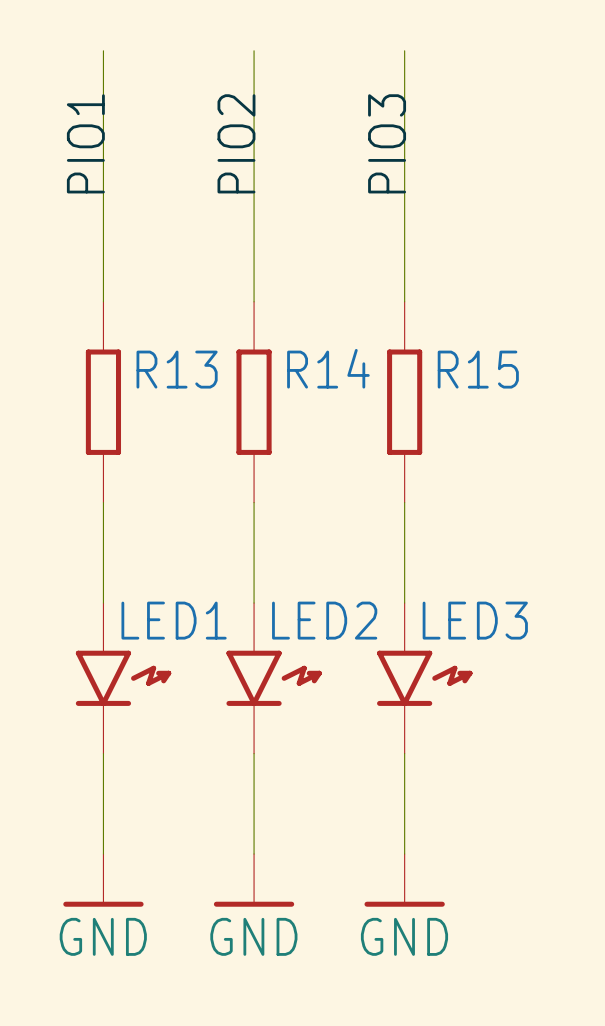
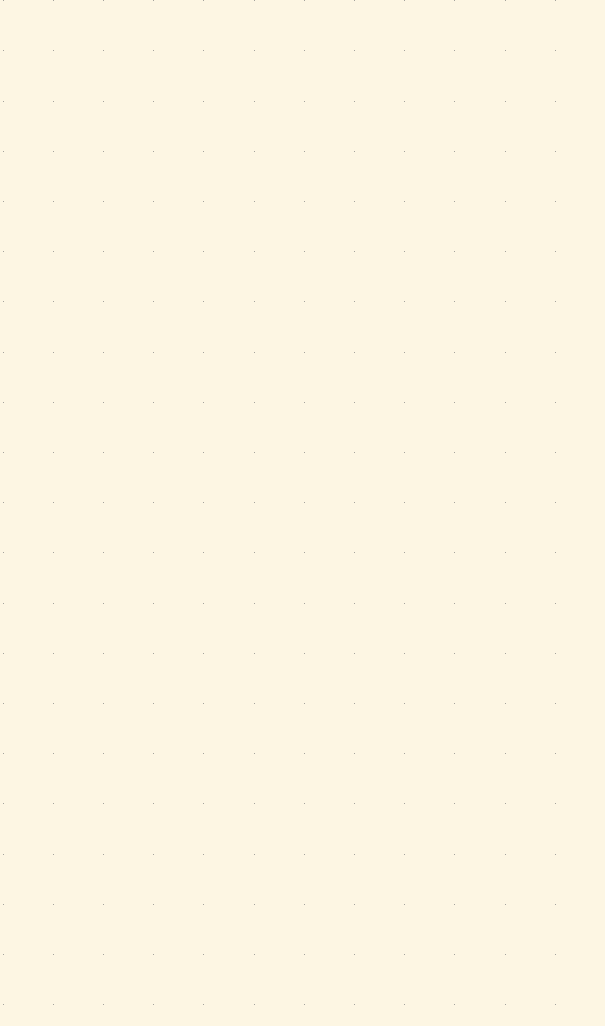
wire: (103, 50) (103, 301) -> none
wire: (254, 50) (254, 301) -> none
wire: (404, 50) (404, 301) -> none
label: PIO1 (85, 143) -> none
label: PIO2 (236, 143) -> none
label: PIO3 (387, 143) -> none
R13: (103, 402) -> none
R14: (254, 402) -> none
R15: (404, 402) -> none
wire: (103, 502) (103, 603) -> none
wire: (254, 502) (254, 603) -> none
wire: (404, 502) (404, 603) -> none
LED1: (123, 678) -> none
LED2: (274, 678) -> none
LED3: (424, 678) -> none
wire: (103, 753) (103, 854) -> none
wire: (254, 753) (254, 854) -> none
wire: (404, 753) (404, 854) -> none
power symbol: GND (103, 880) -> none
power symbol: GND (254, 880) -> none
power symbol: GND (404, 880) -> none

